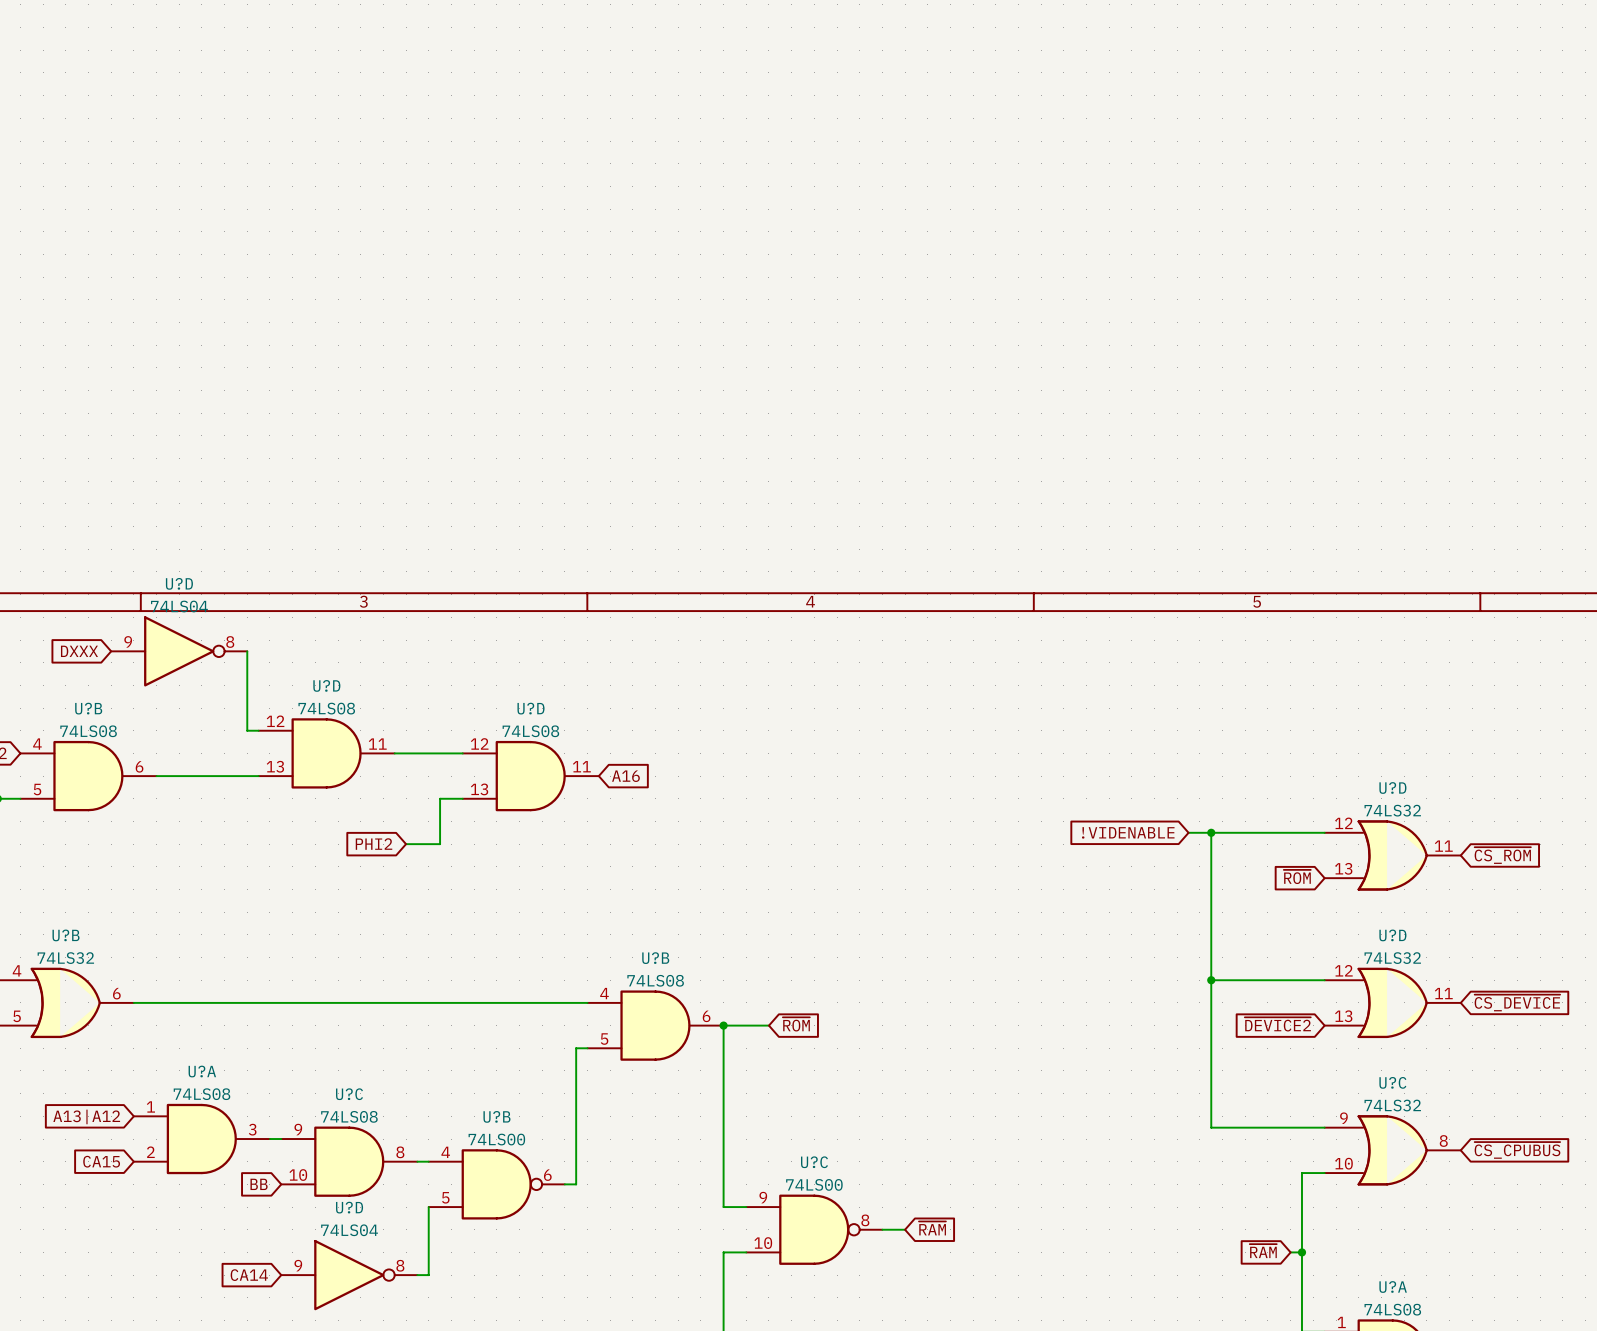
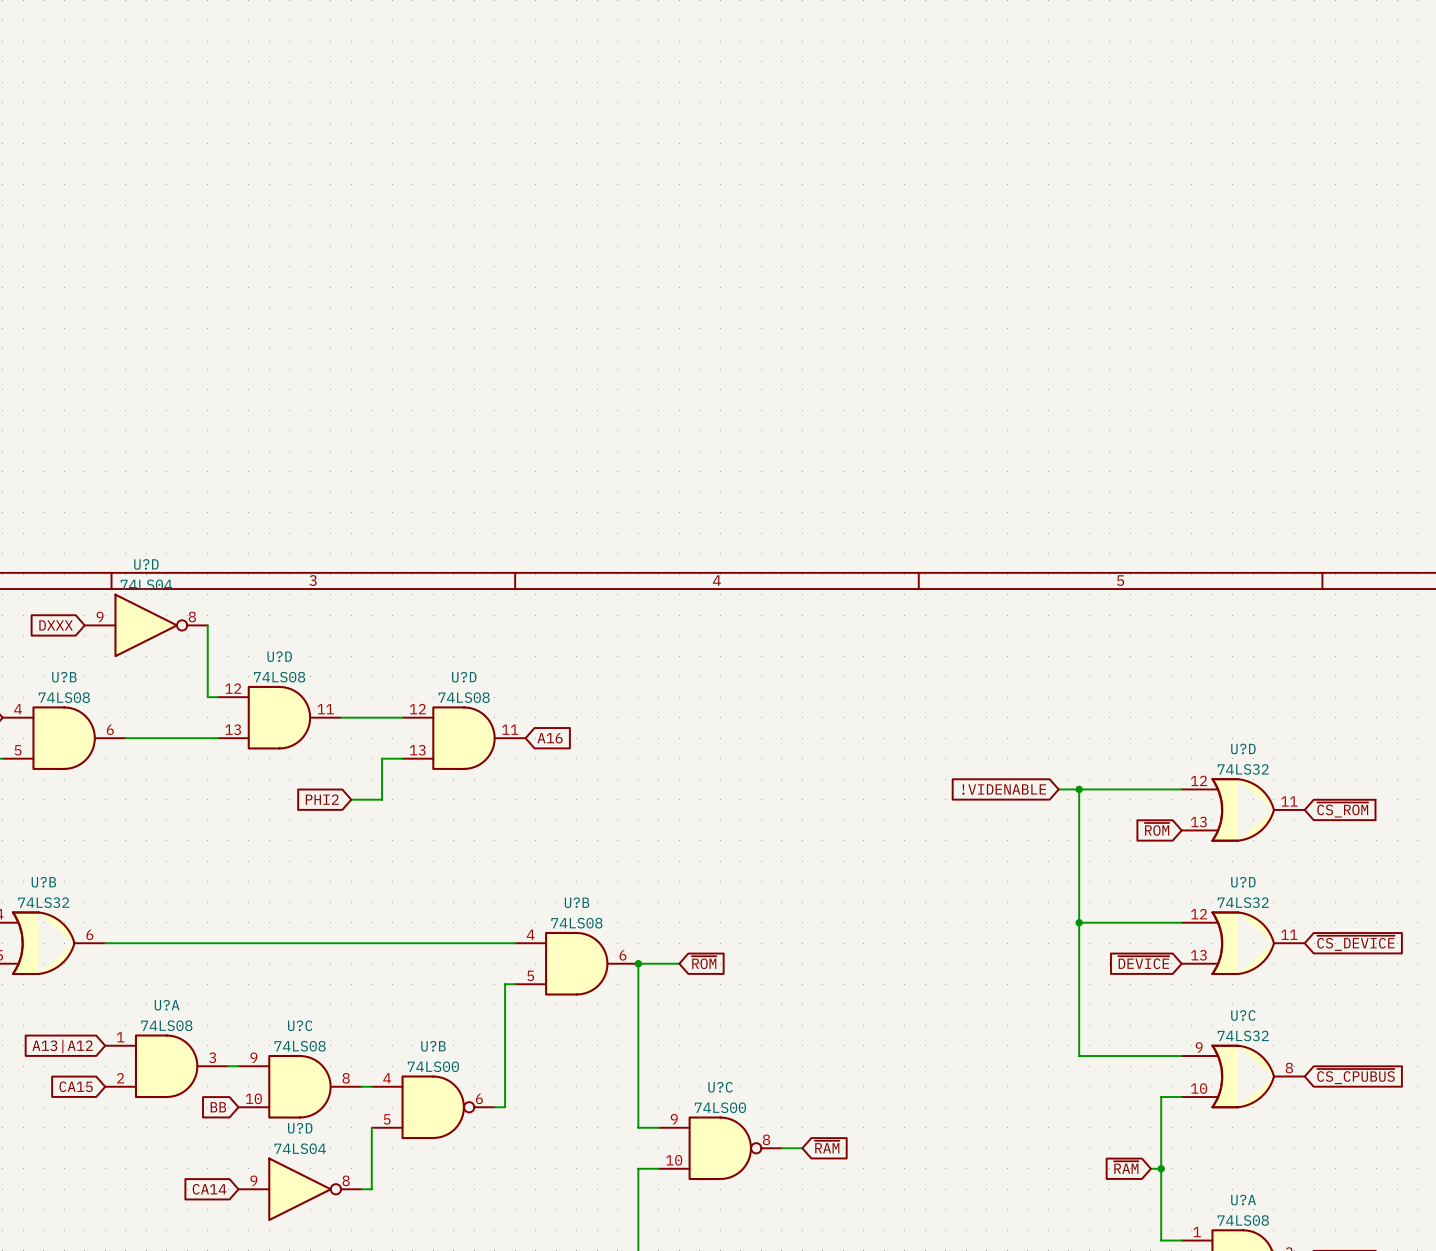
global label: ~{DEVICE2} (1277, 1024) -> ~{DEVICE} (1143, 962)

